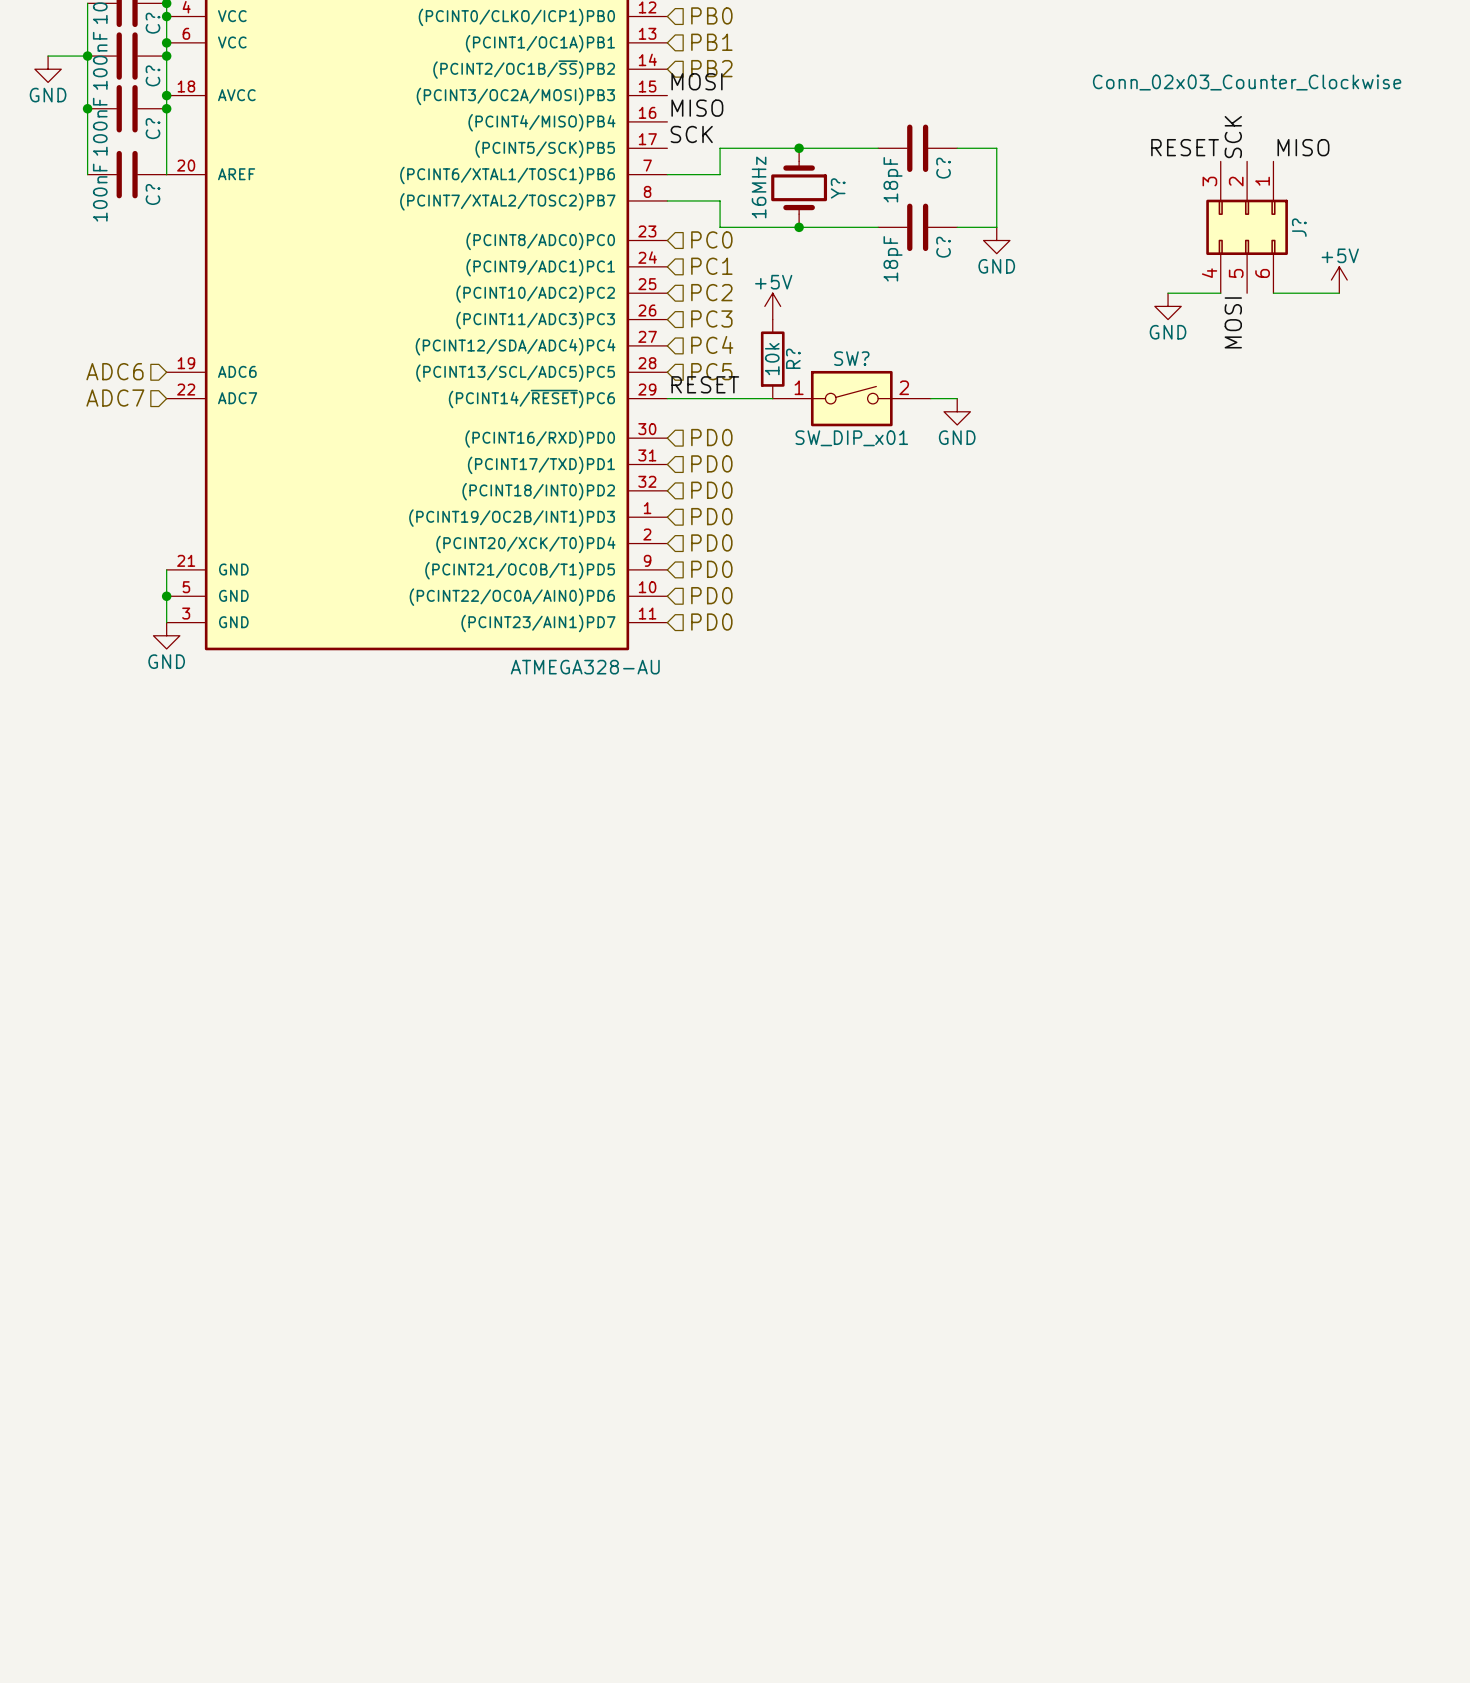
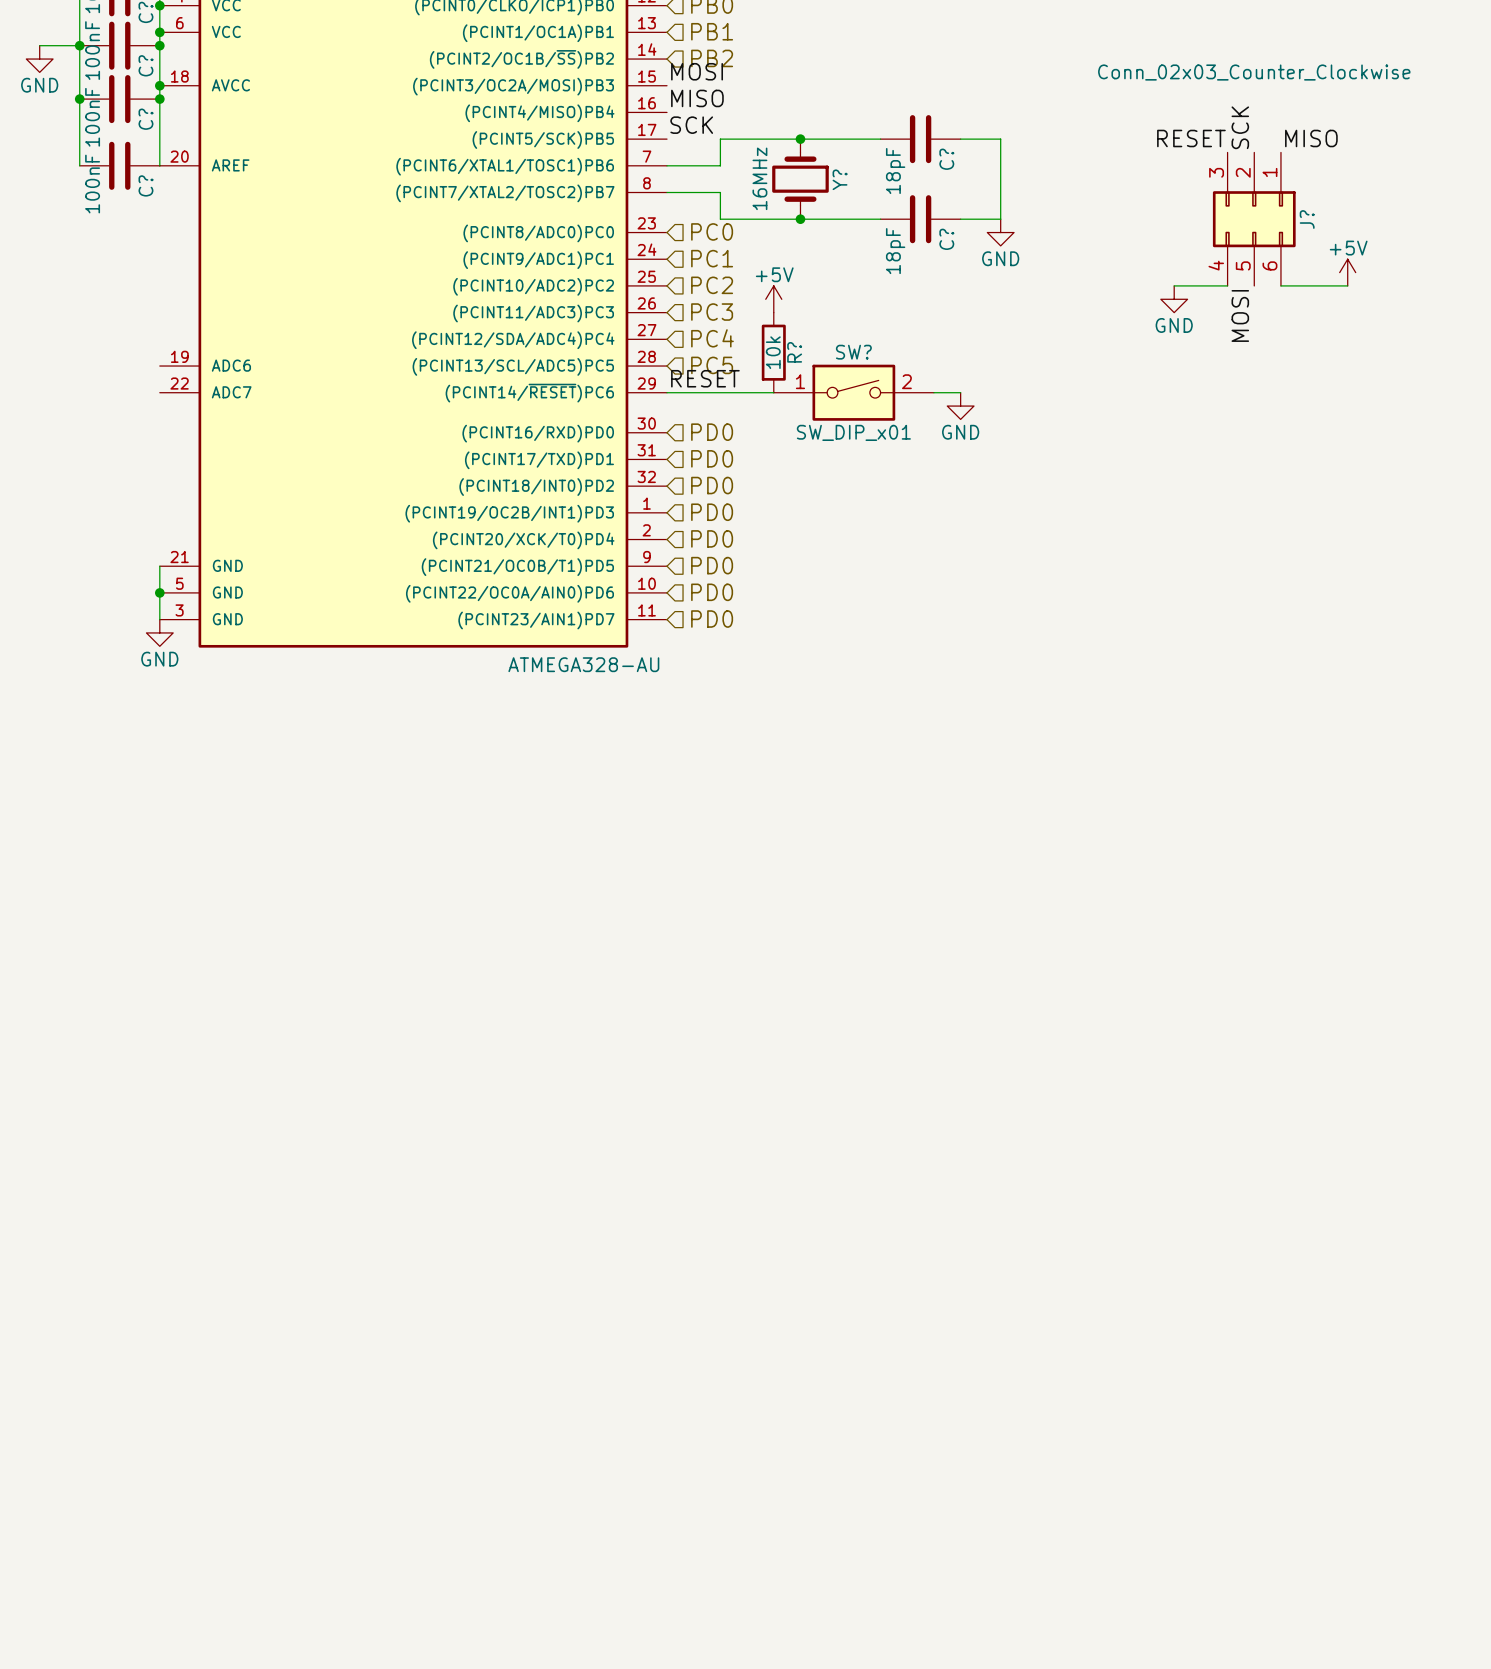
hierarchical label: ADC6 (114, 371) -> none
hierarchical label: ADC7 (115, 398) -> none

